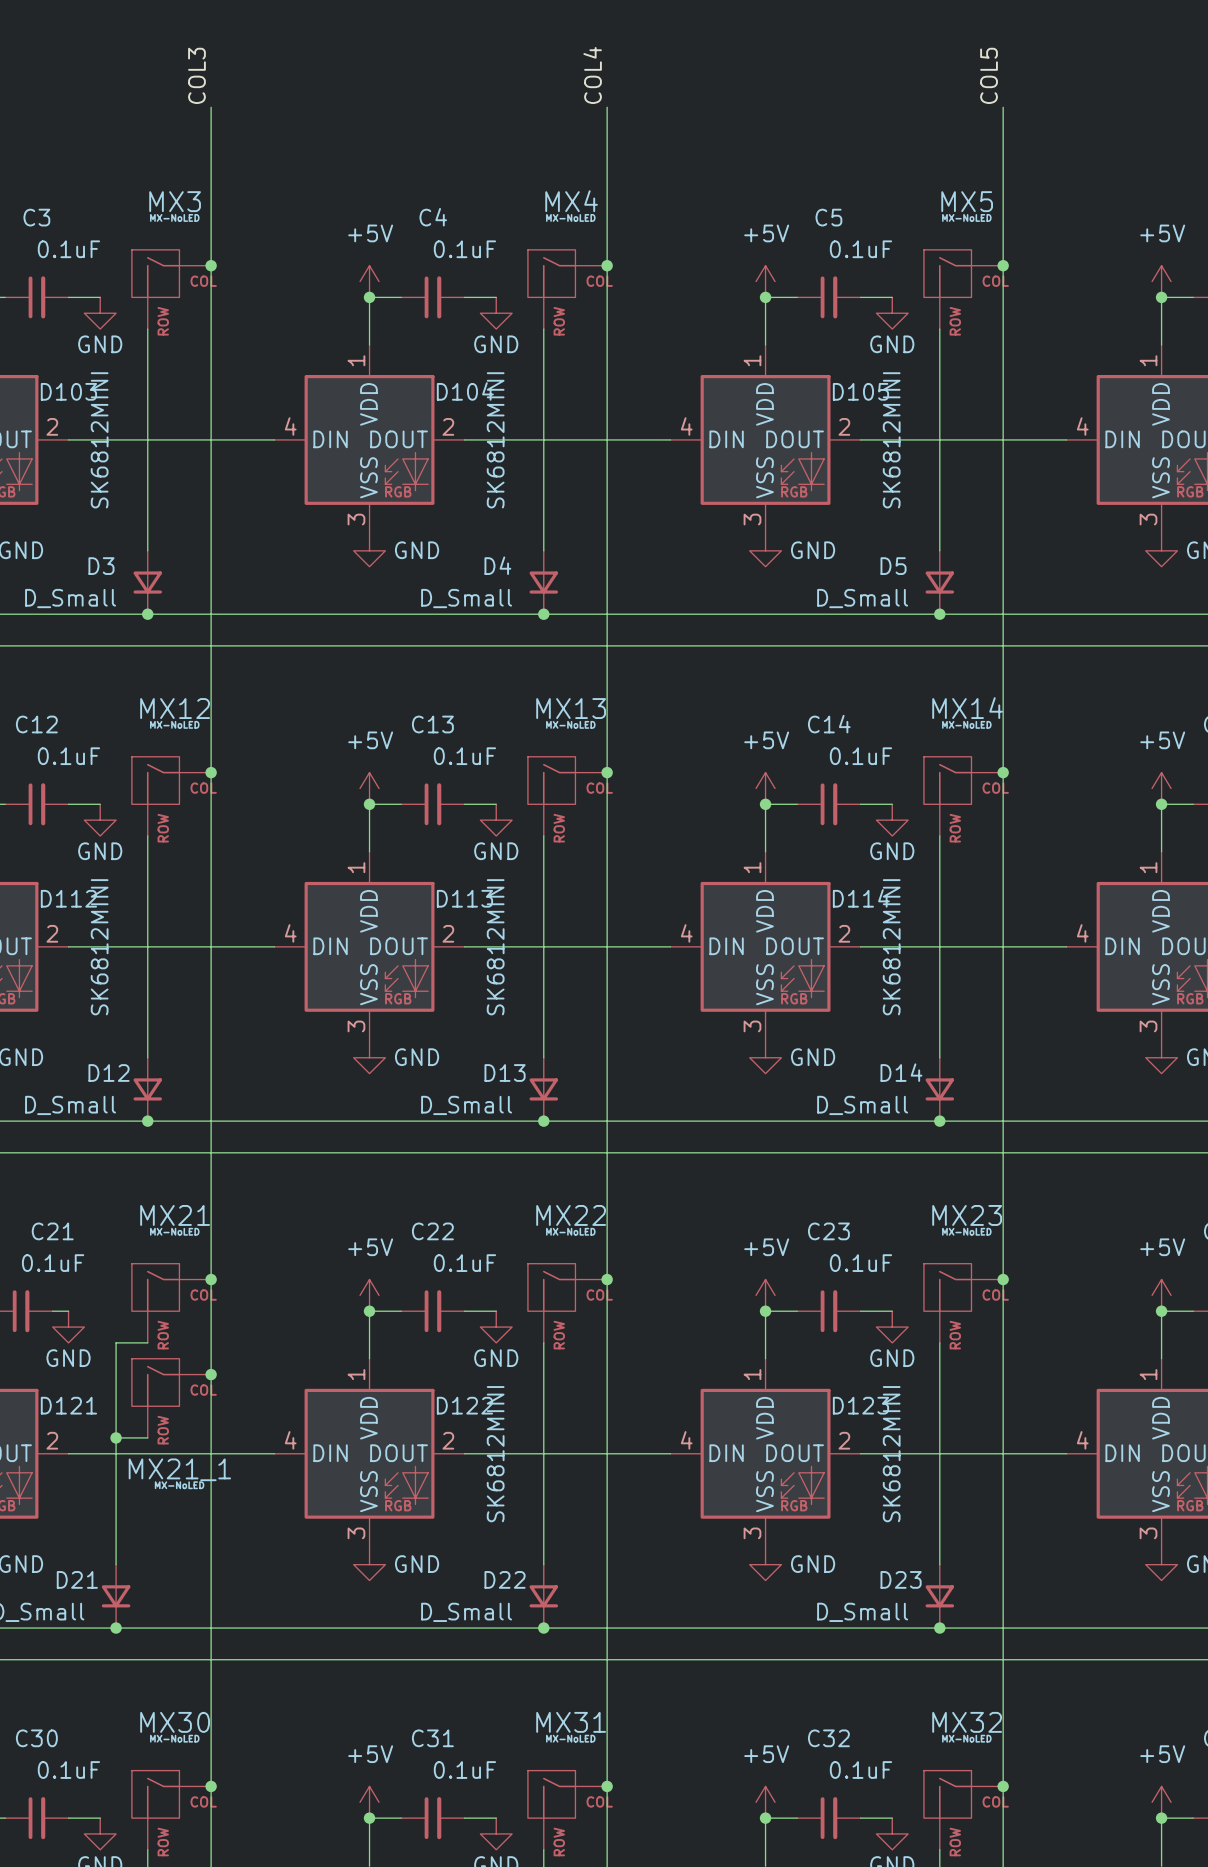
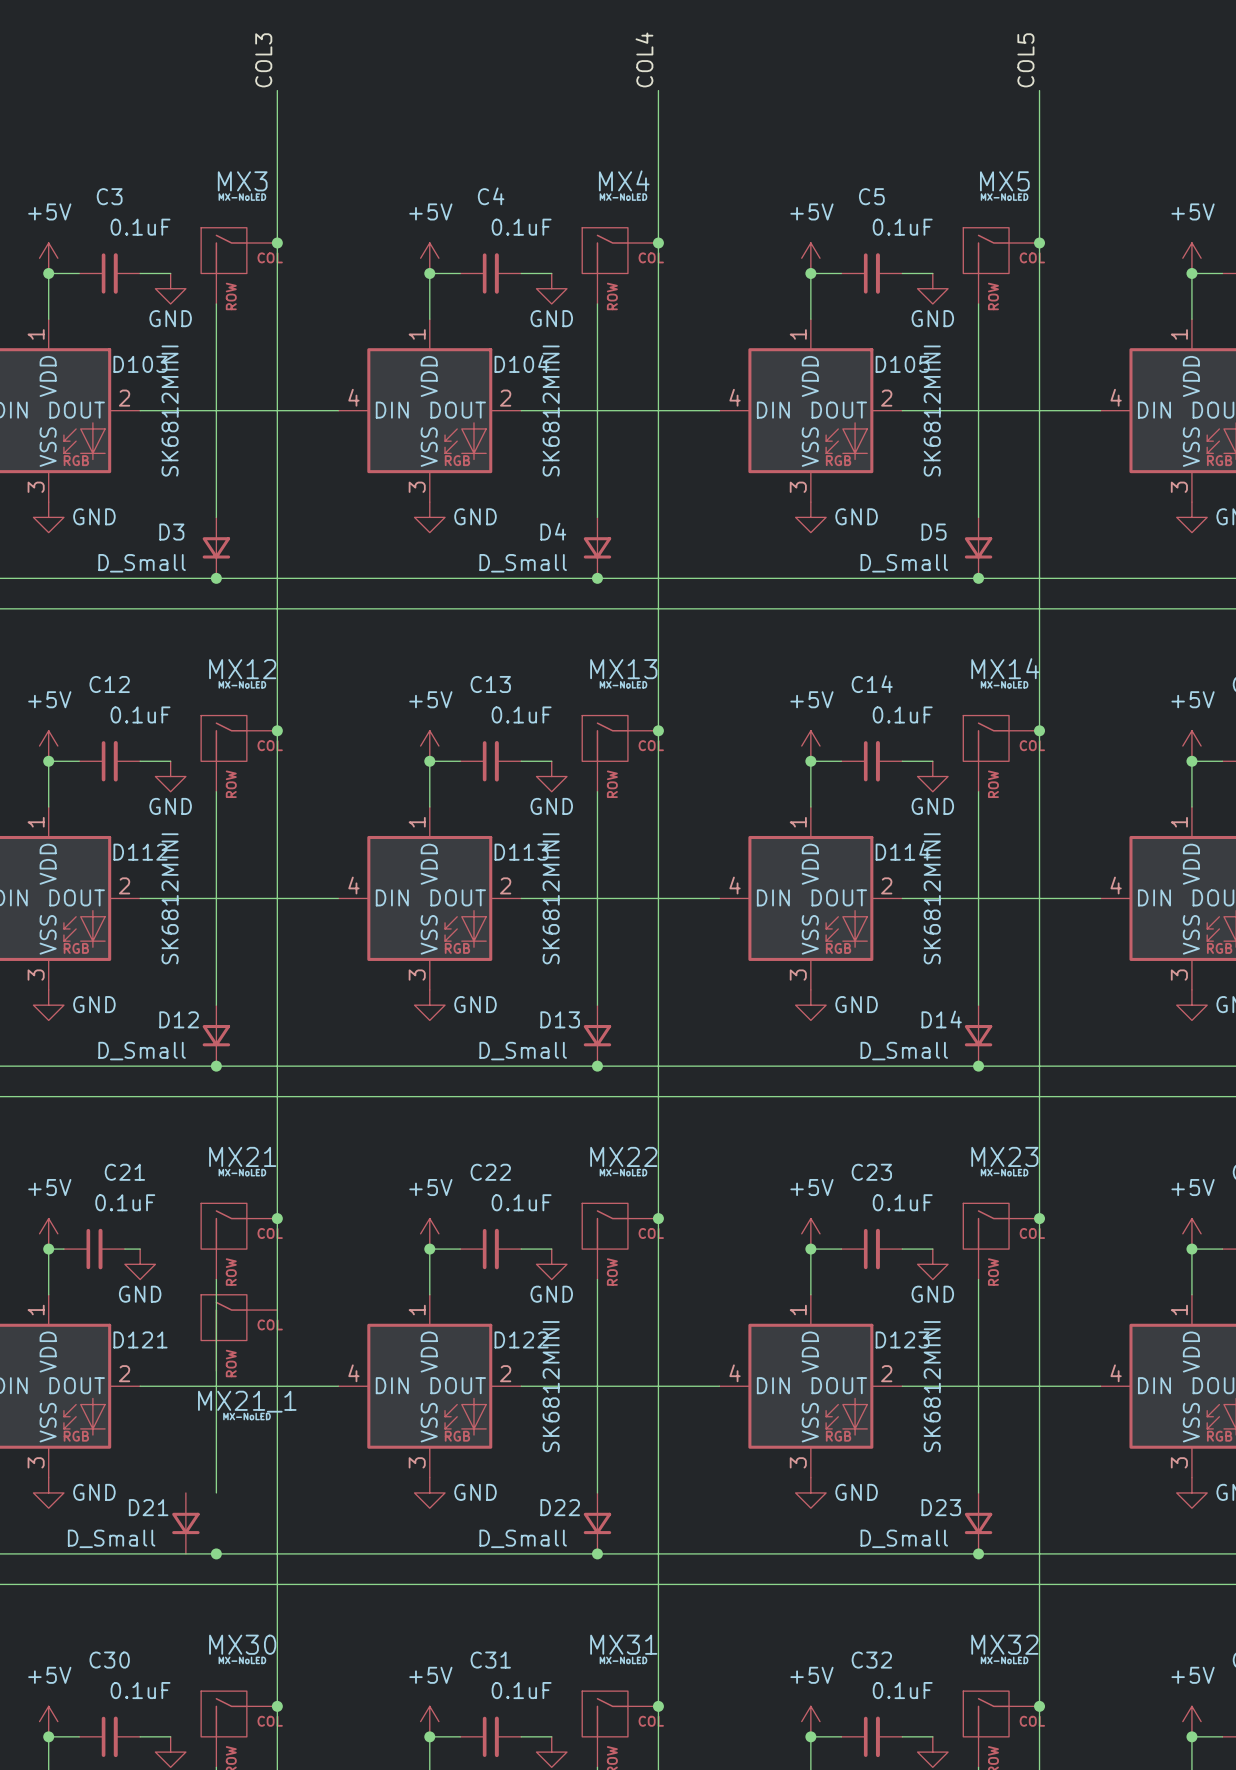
wire: (147, 1342) (116, 1342) (116, 1564) -> (216, 1279) (216, 1492)
junction: (211, 1374) -> none
wire: (116, 1437) (147, 1437) -> none
junction: (116, 1437) -> none
junction position: (116, 1628) -> (216, 1553)

